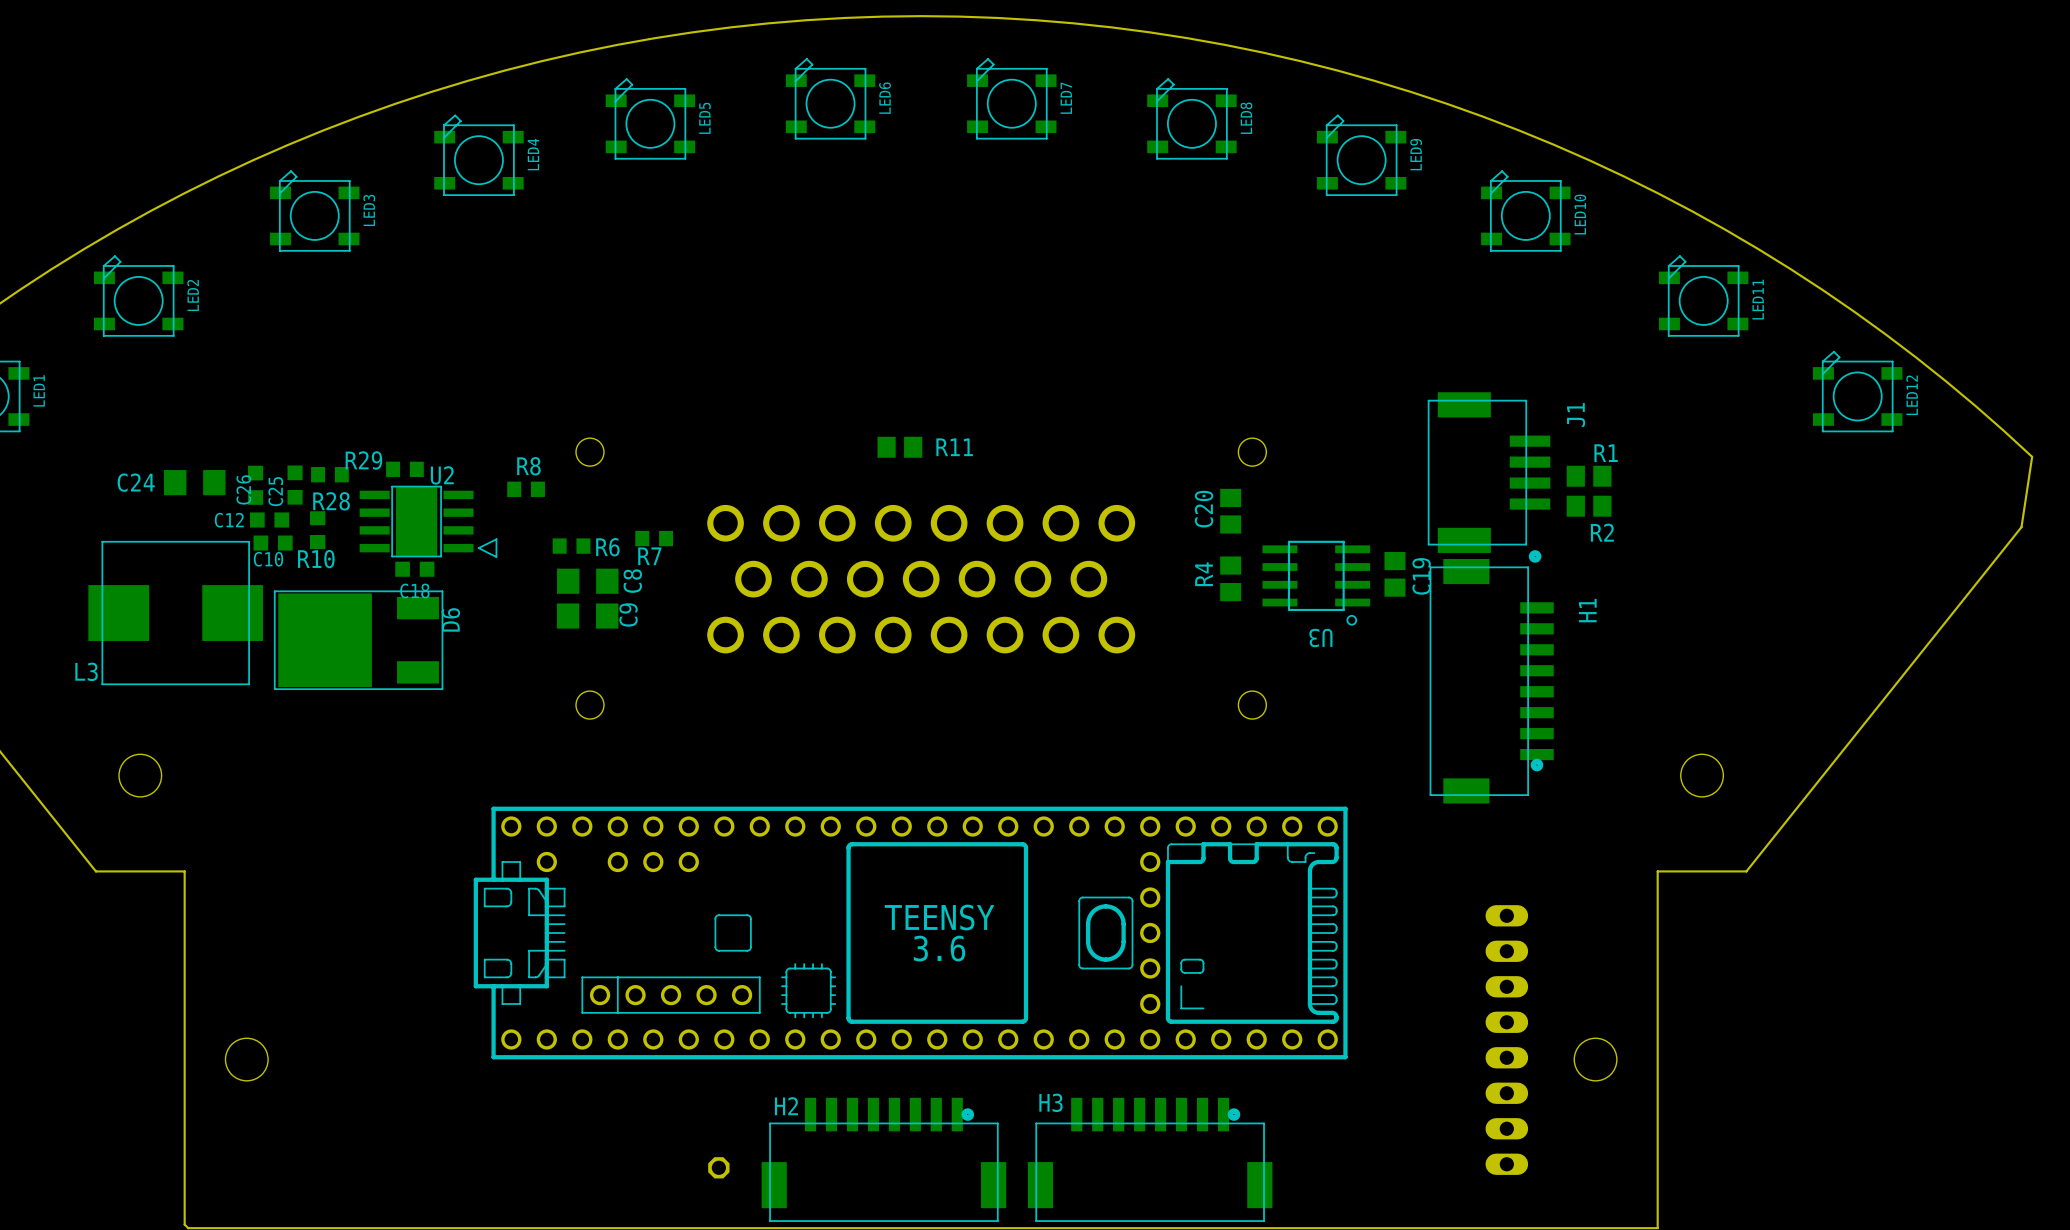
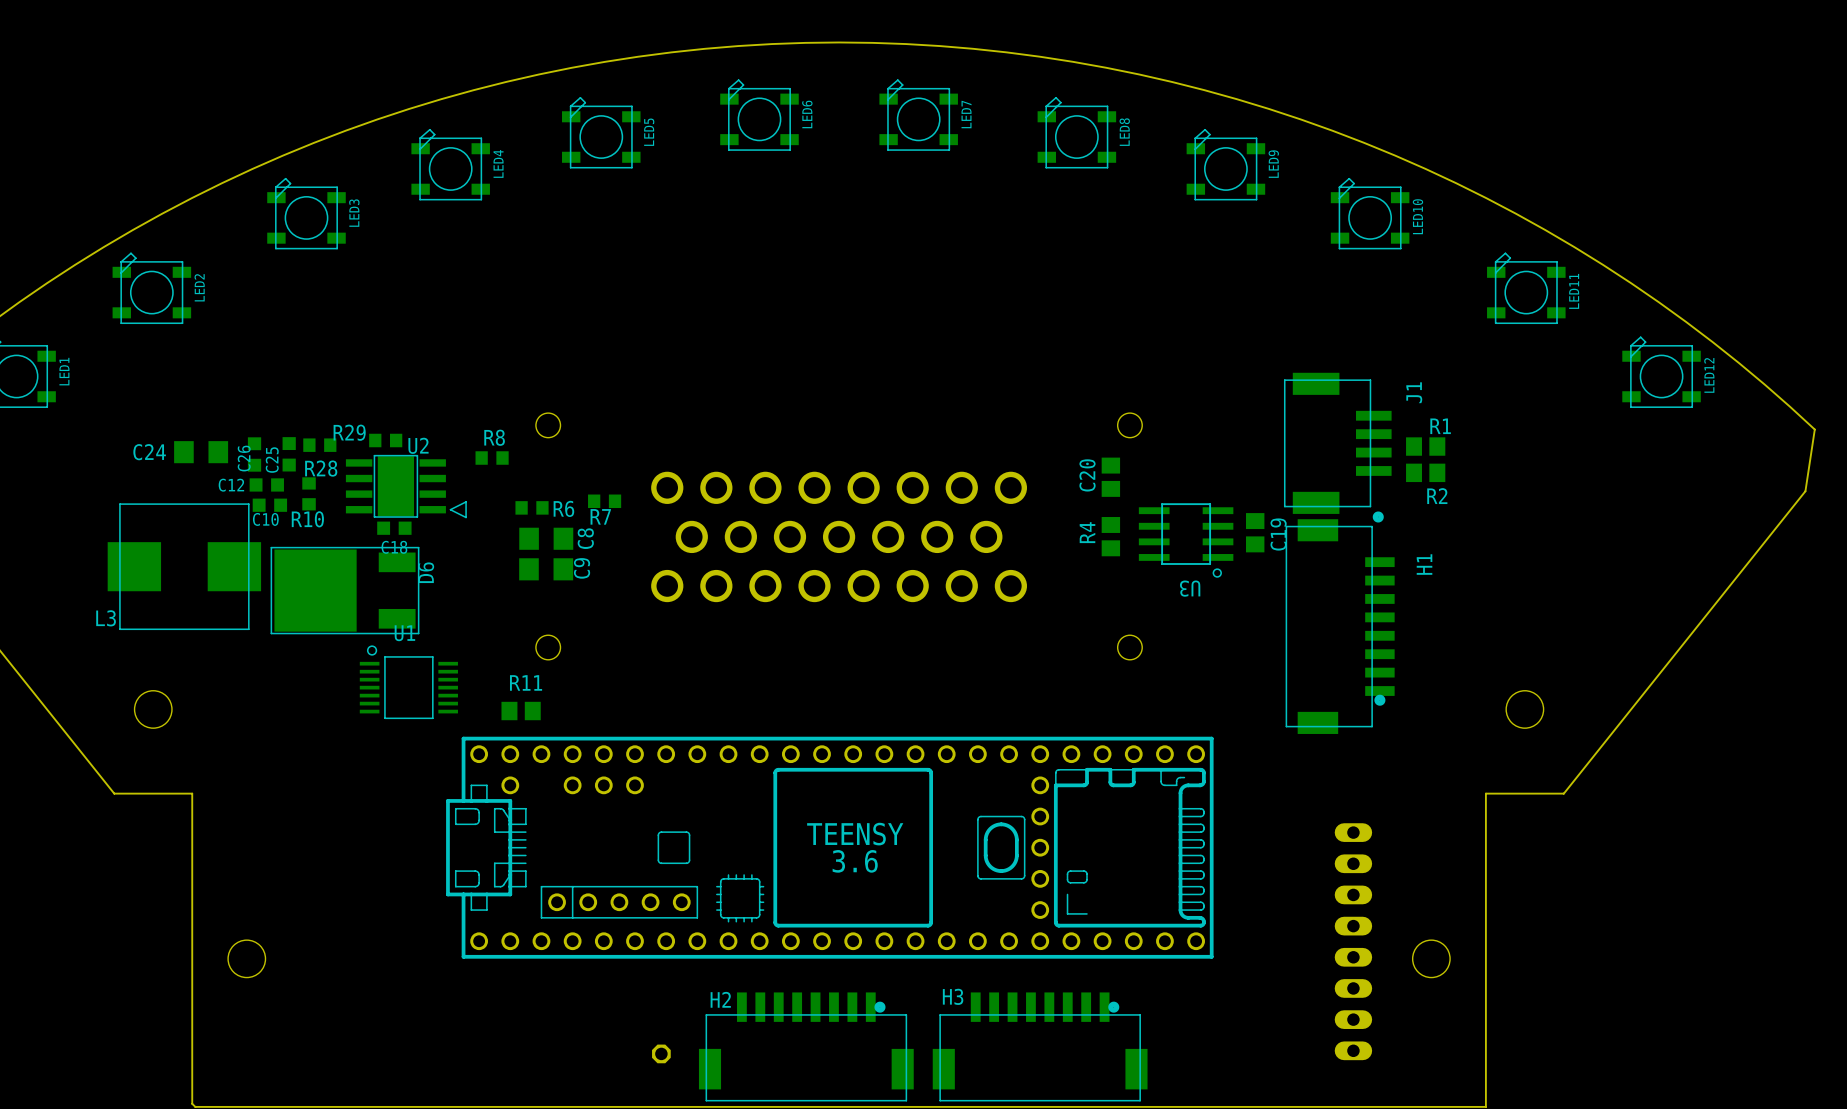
R11 position: (899, 447) -> (521, 711)
R11 name position: R11 (954, 447) -> R11 (526, 682)
U1: none -> (408, 682)

